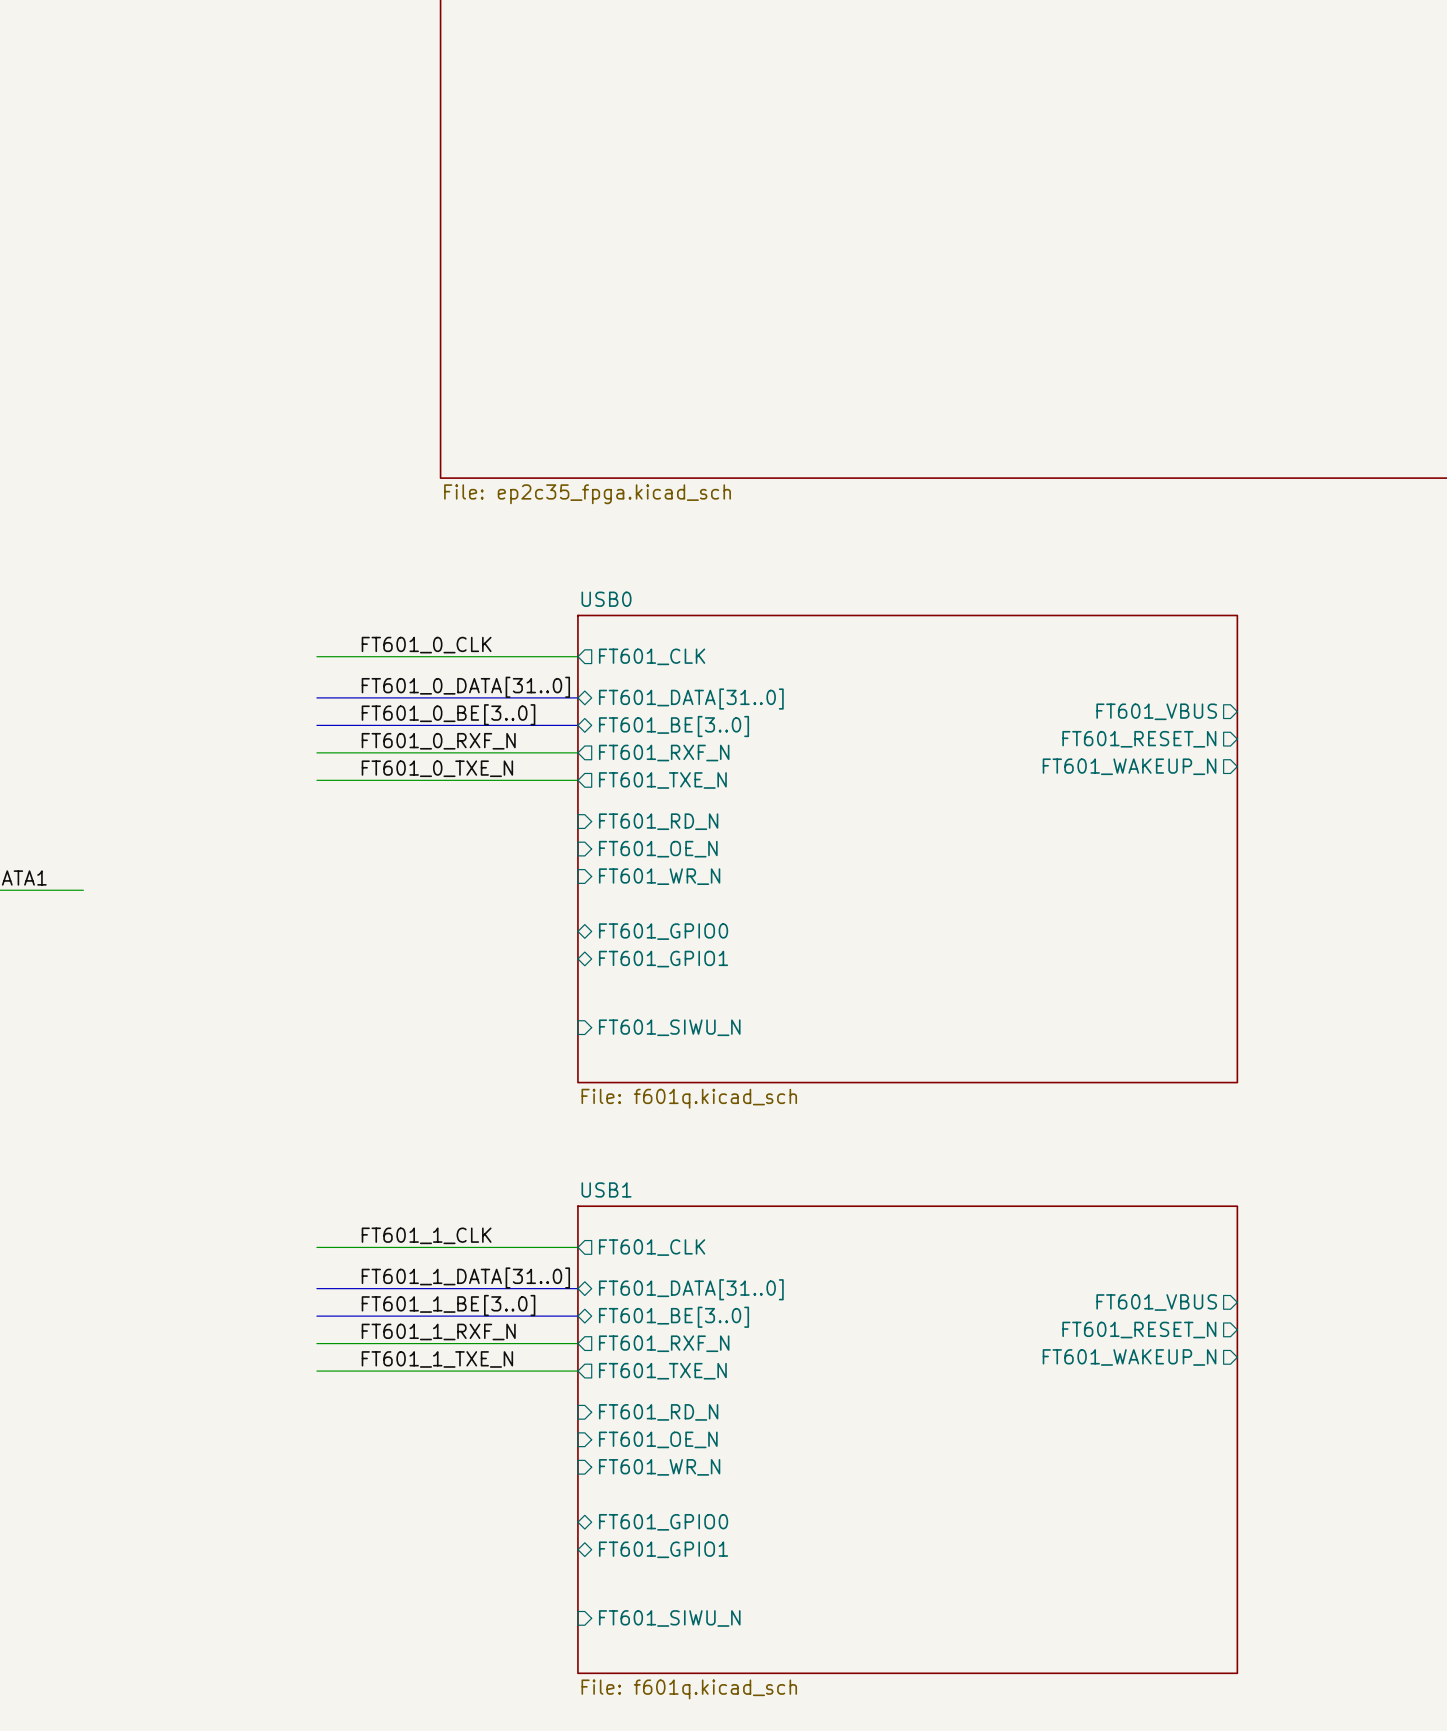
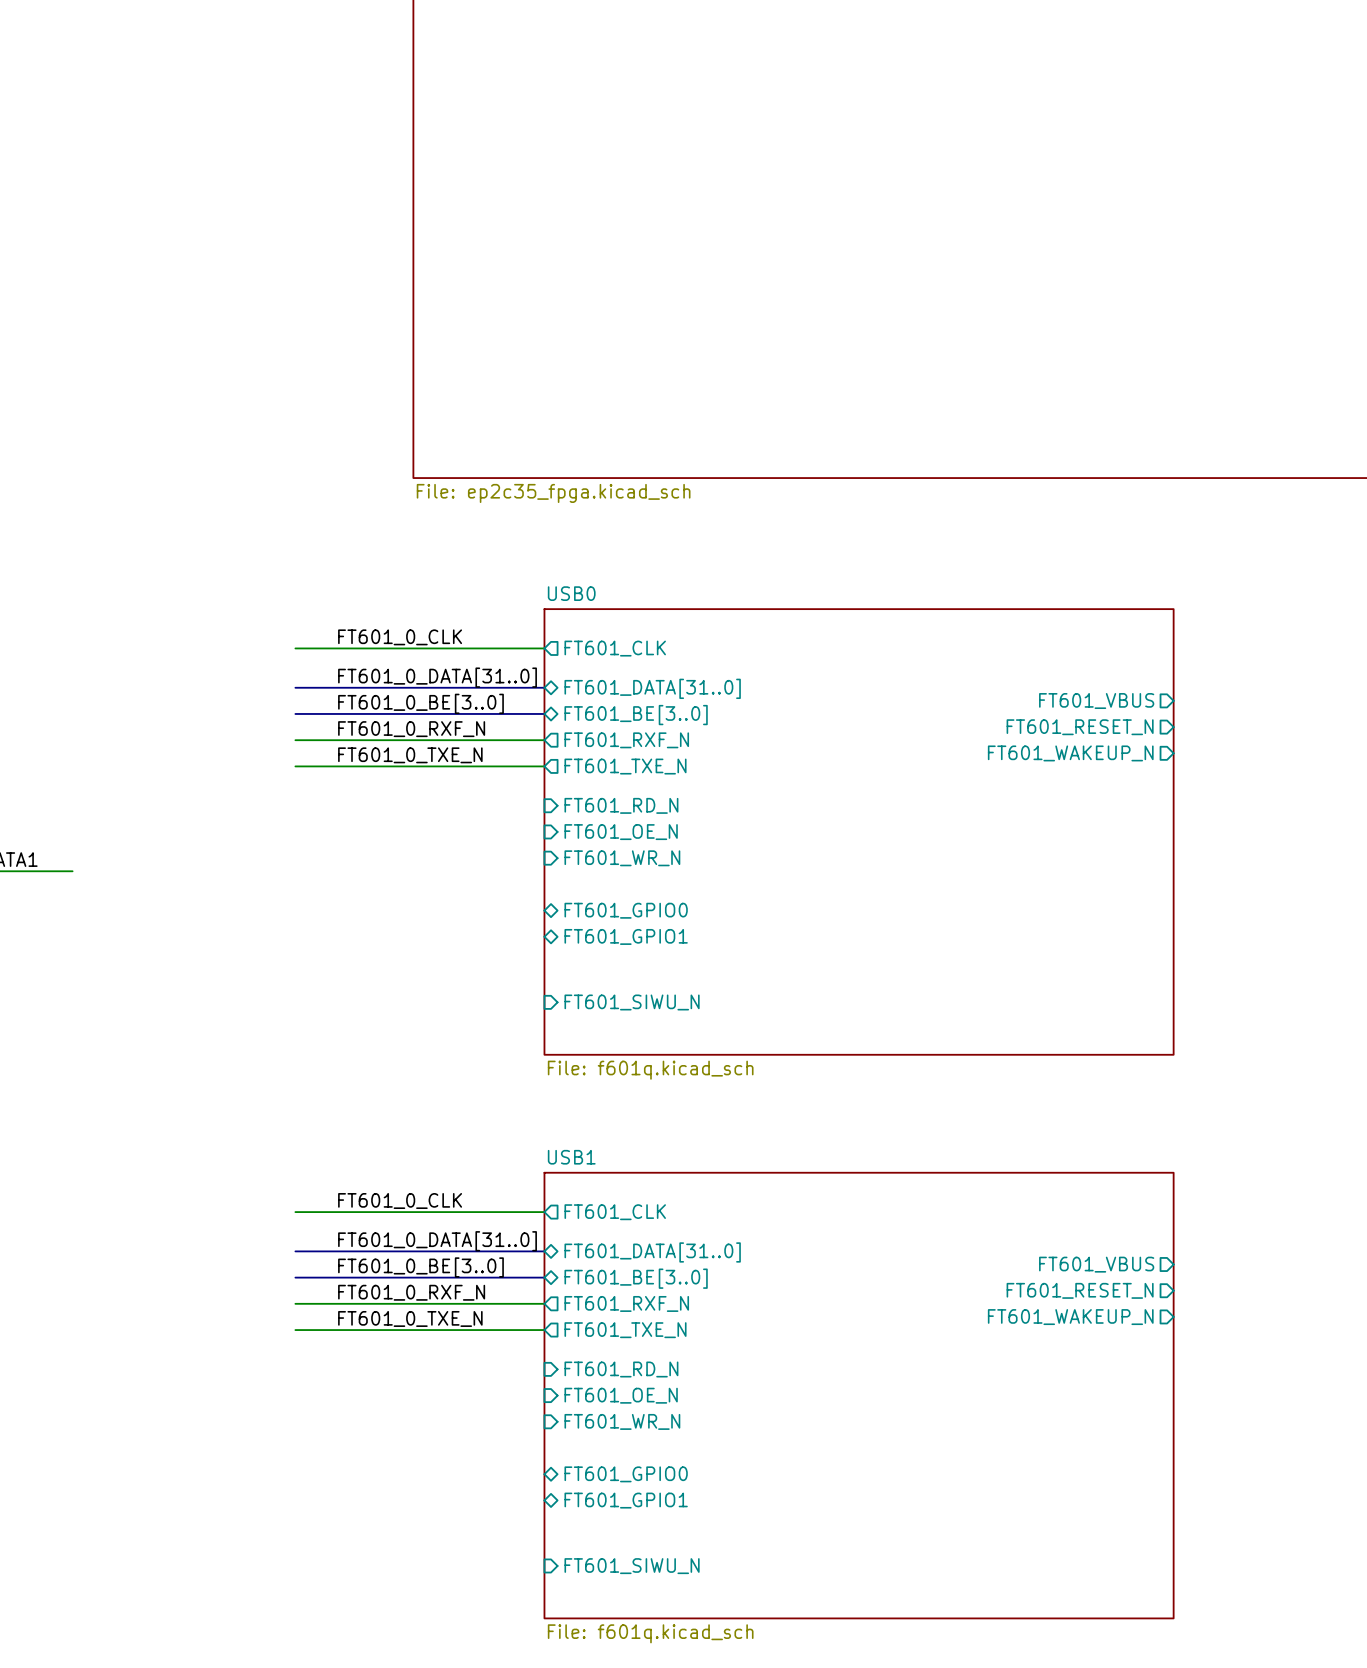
label: FT601_1_CLK (426, 1235) -> FT601_0_CLK (400, 1201)
label: FT601_1_DATA[31..0] (465, 1278) -> FT601_0_DATA[31..0] (437, 1241)
label: FT601_1_BE[3..0] (448, 1305) -> FT601_0_BE[3..0] (420, 1267)
label: FT601_1_RXF_N (438, 1331) -> FT601_0_RXF_N (411, 1292)
label: FT601_1_TXE_N (437, 1359) -> FT601_0_TXE_N (410, 1318)

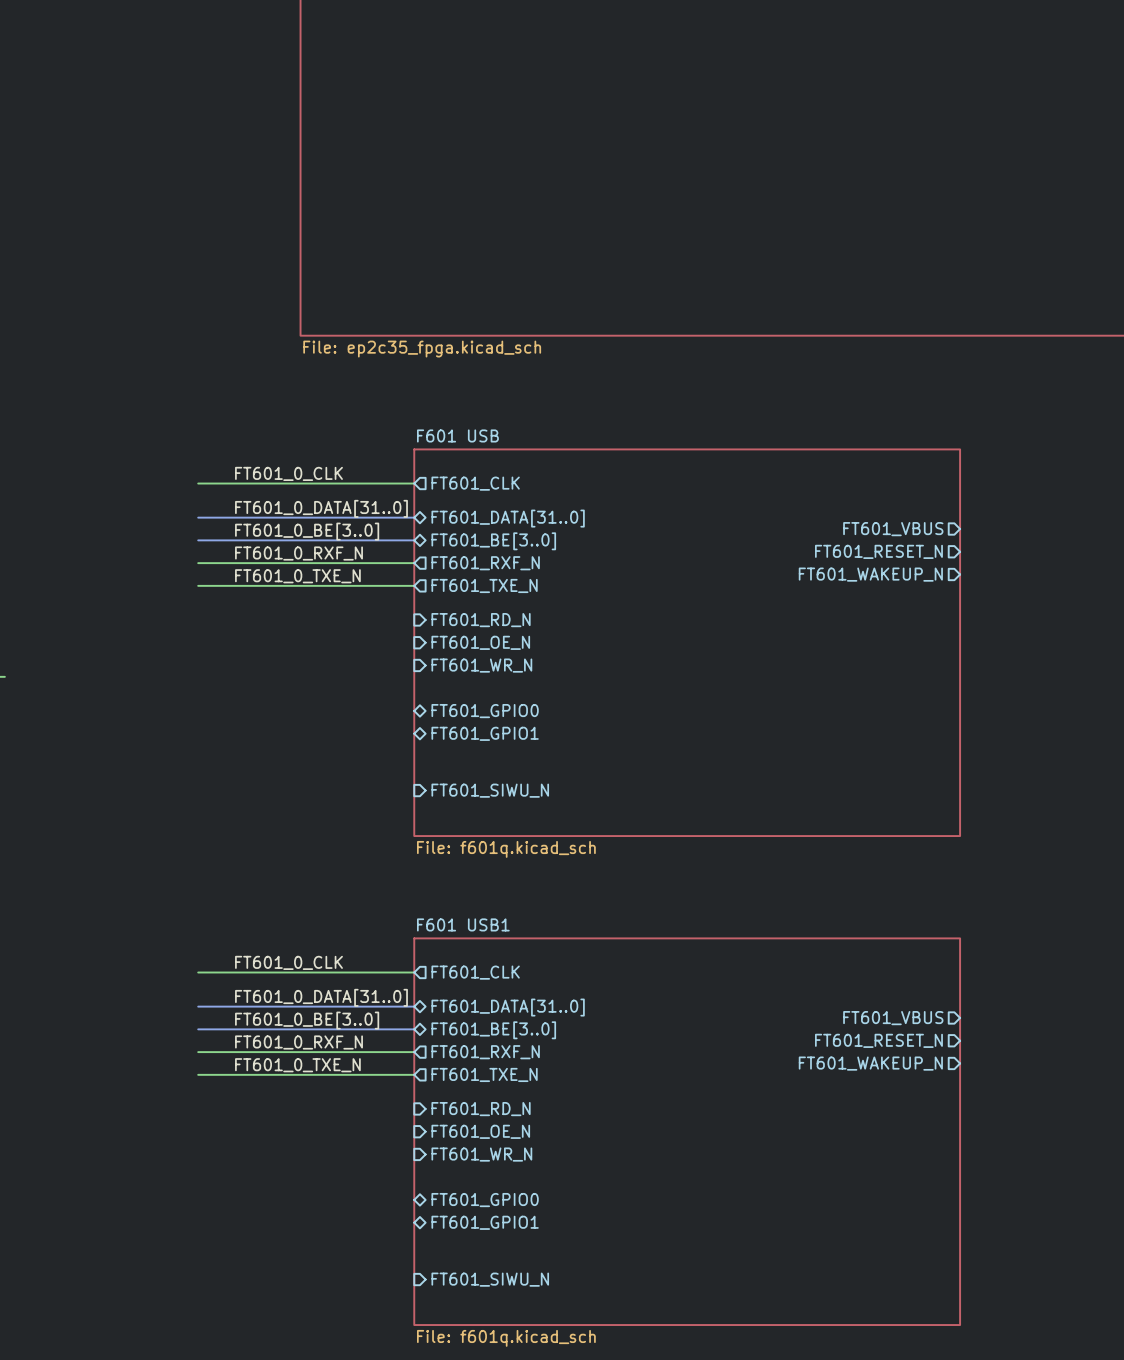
sheet USB0 name: USB0 (571, 593) -> F601 USB (457, 435)
sheet USB1 name: USB1 (571, 1157) -> F601 USB1 (463, 924)

